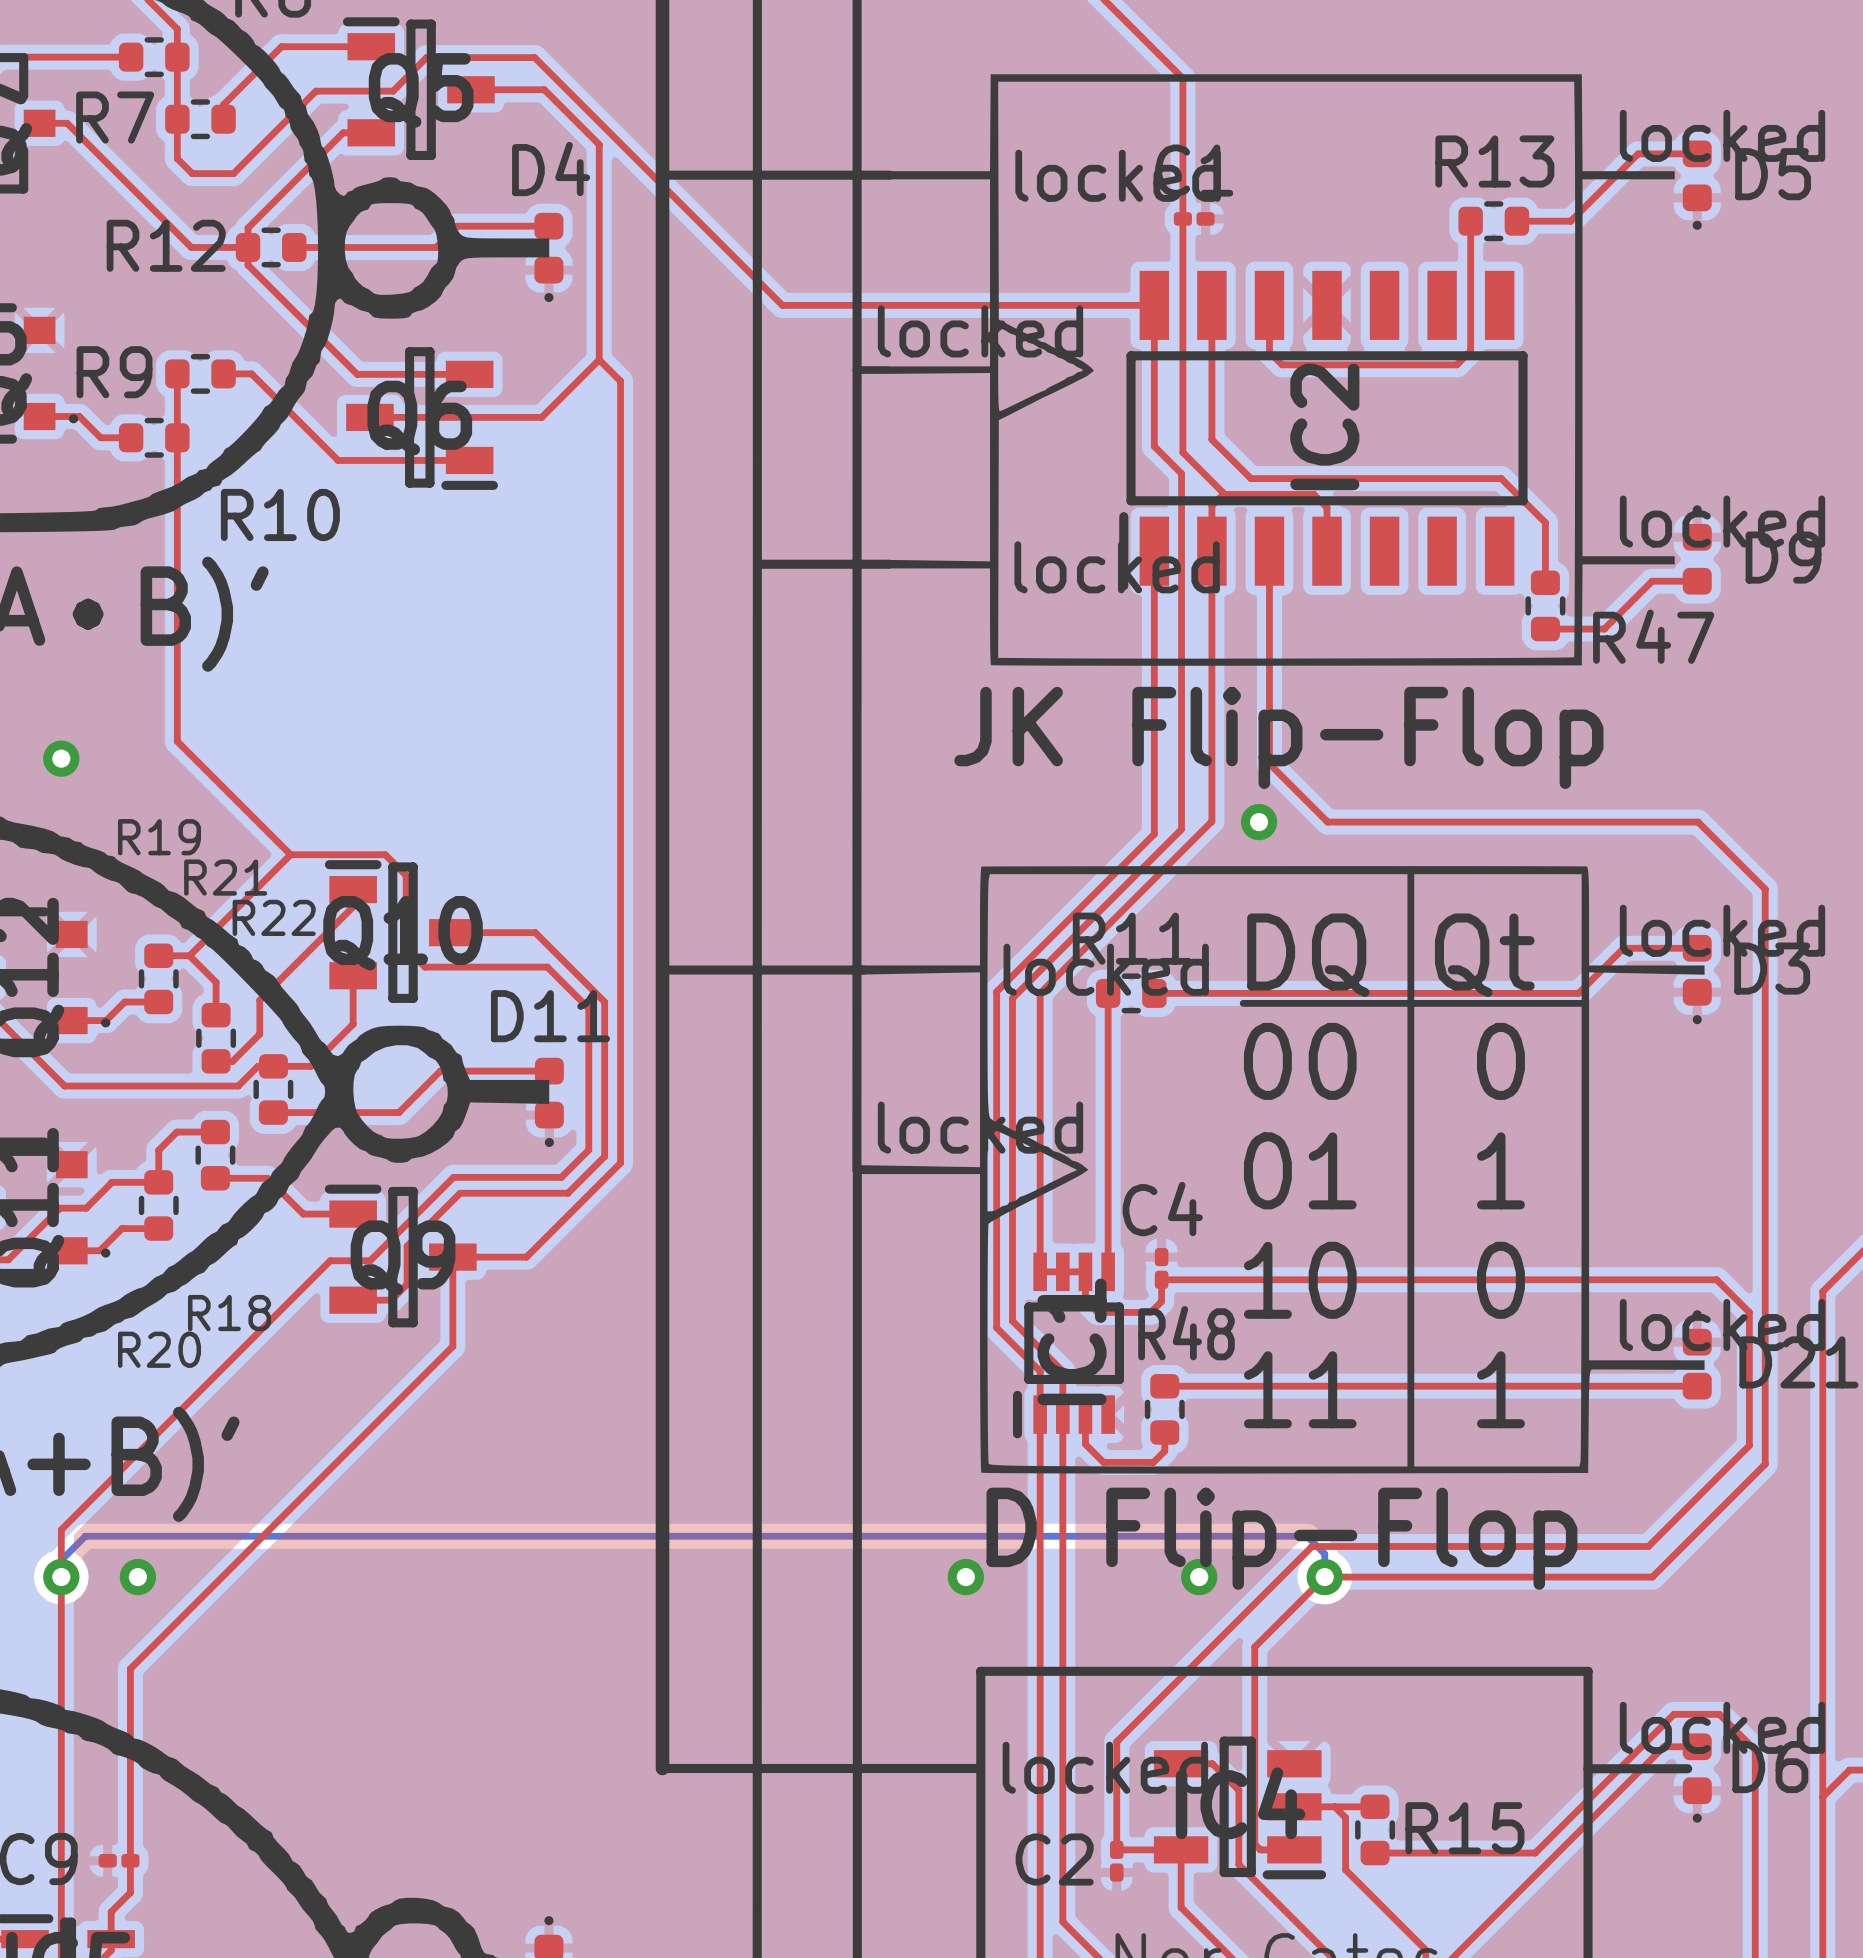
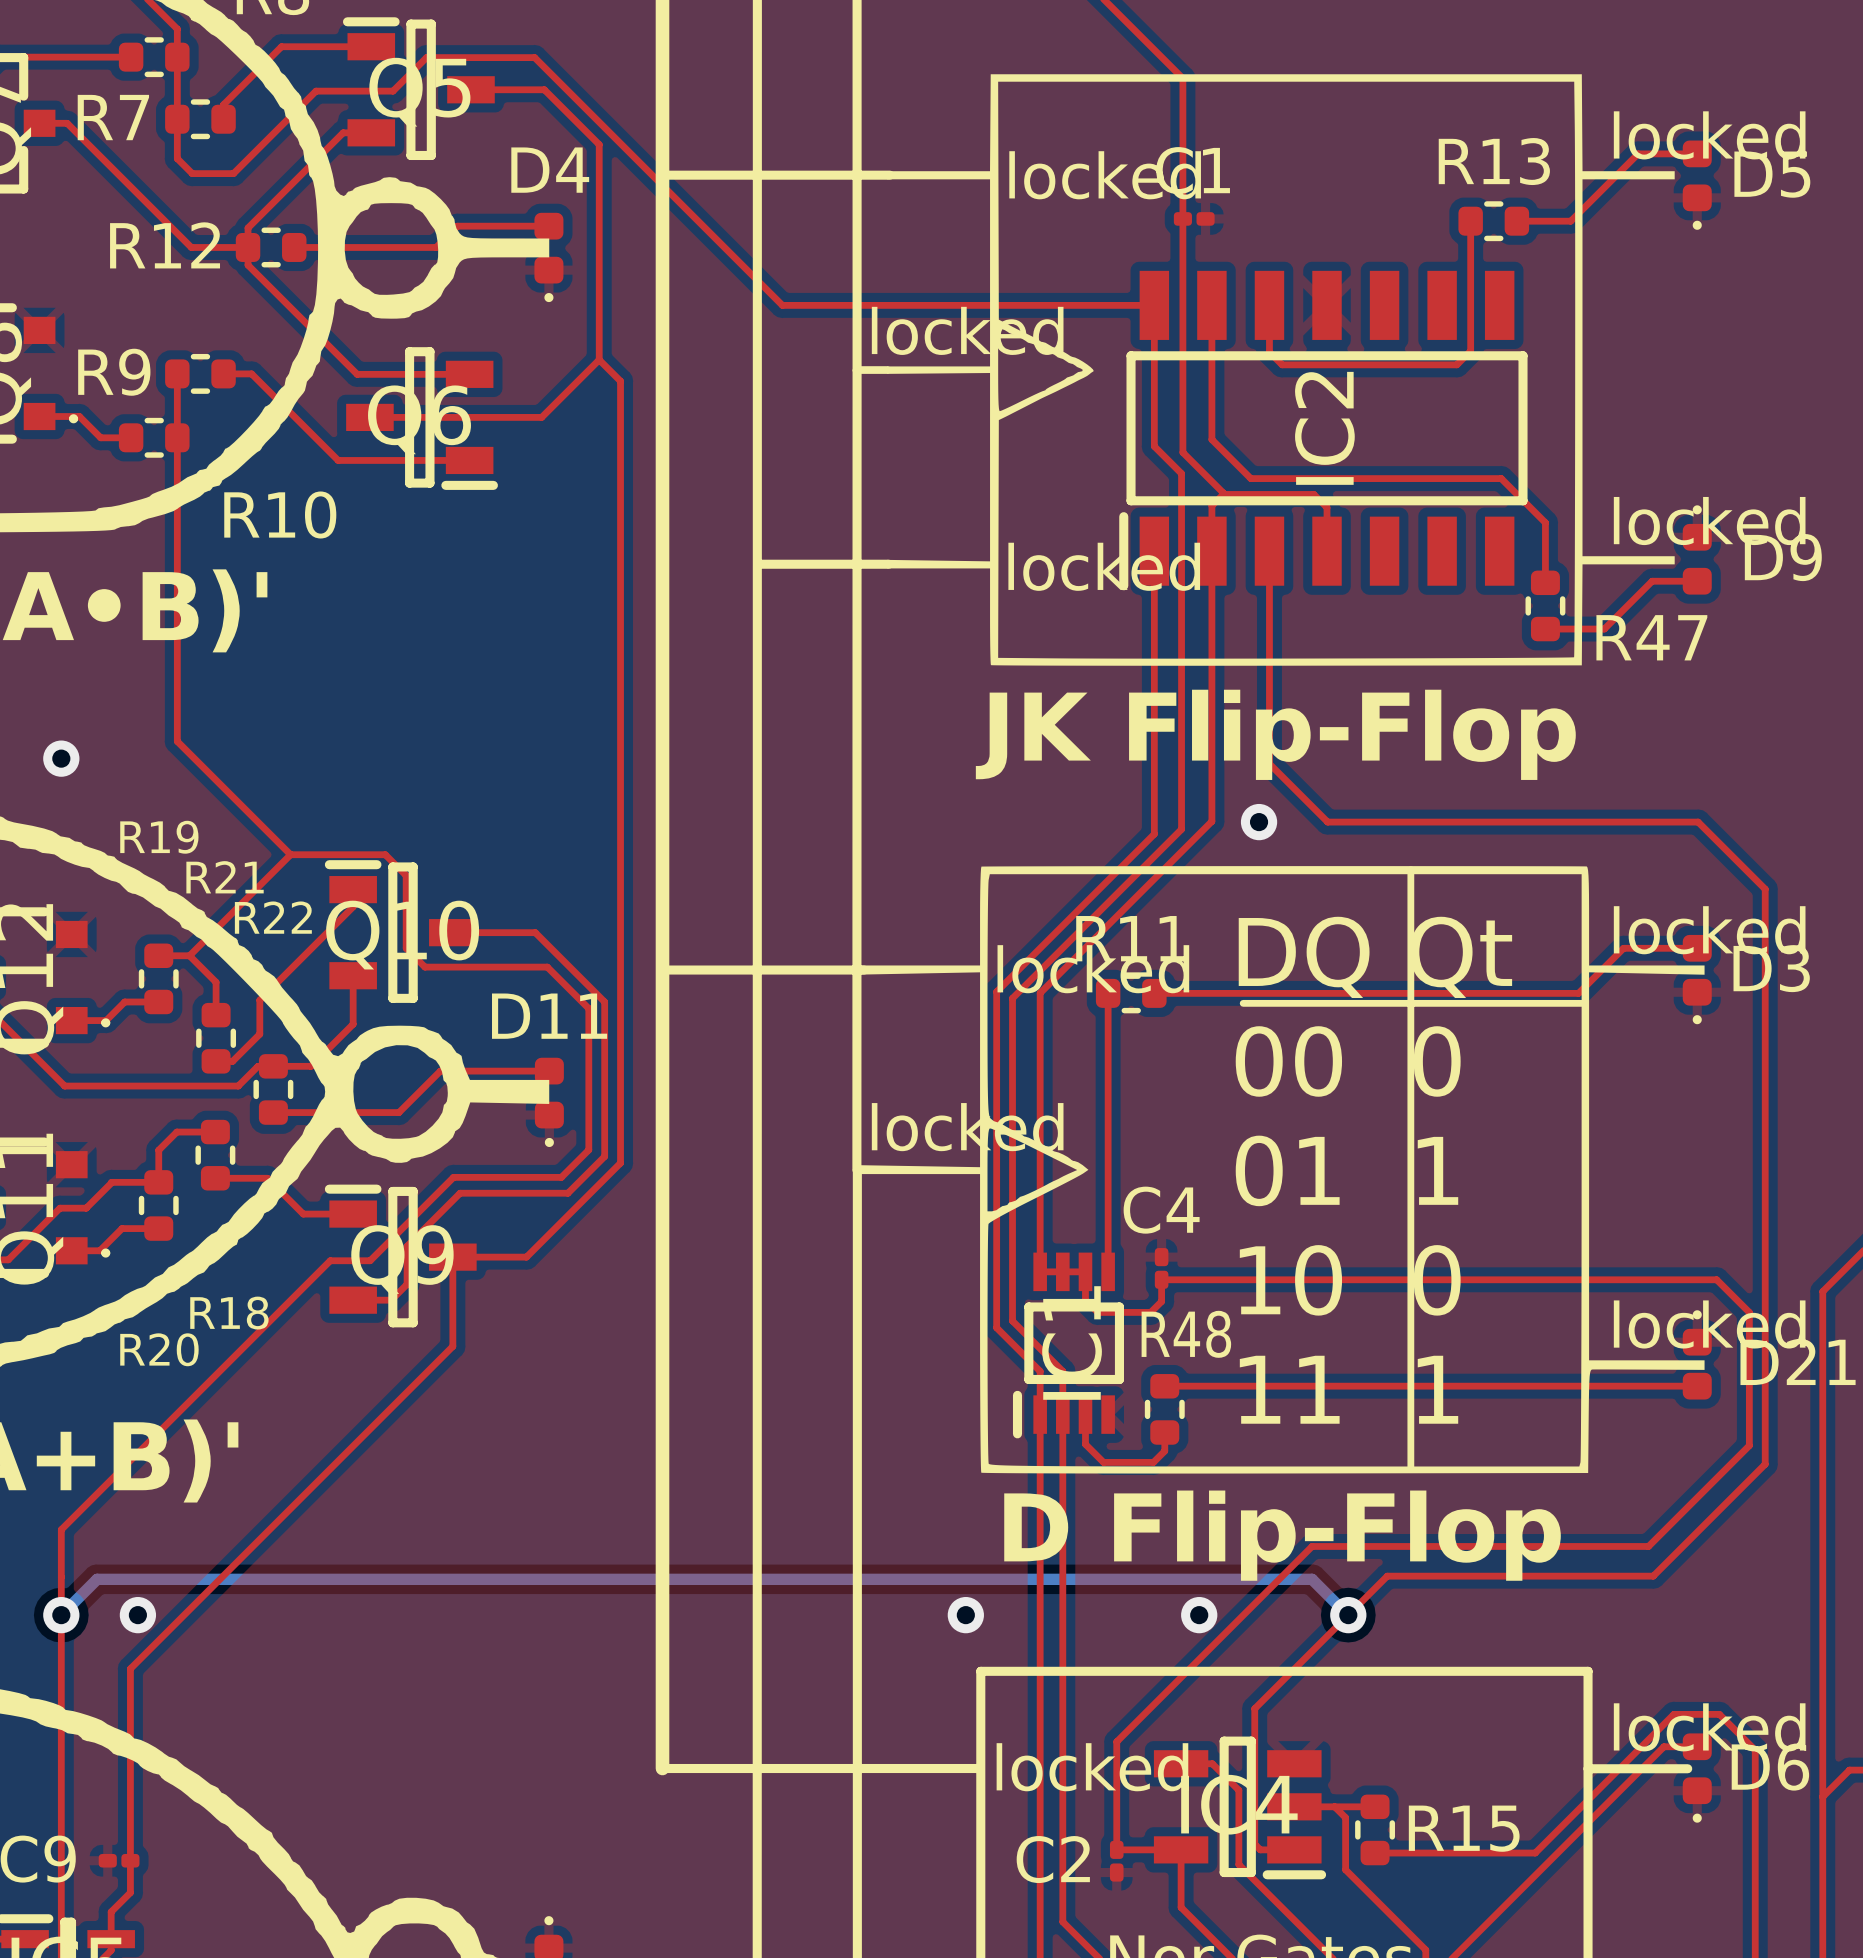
top track: (1653, 1576) (1324, 1577) (1254, 1647) (1254, 1708) -> (1653, 1576) (1387, 1576) (1254, 1708)
bottom track: (61, 1577) (61, 1560) (85, 1536) (1307, 1536) (1324, 1553) (1324, 1577) -> none
via position: (61, 1577) -> (61, 1615)
via position: (137, 1577) -> (137, 1615)
via position: (965, 1577) -> (965, 1615)
via position: (1199, 1577) -> (1199, 1615)
via position: (1324, 1577) -> (1348, 1615)
bottom track: none -> (61, 1615) (97, 1579) (1312, 1579) (1347, 1615)

